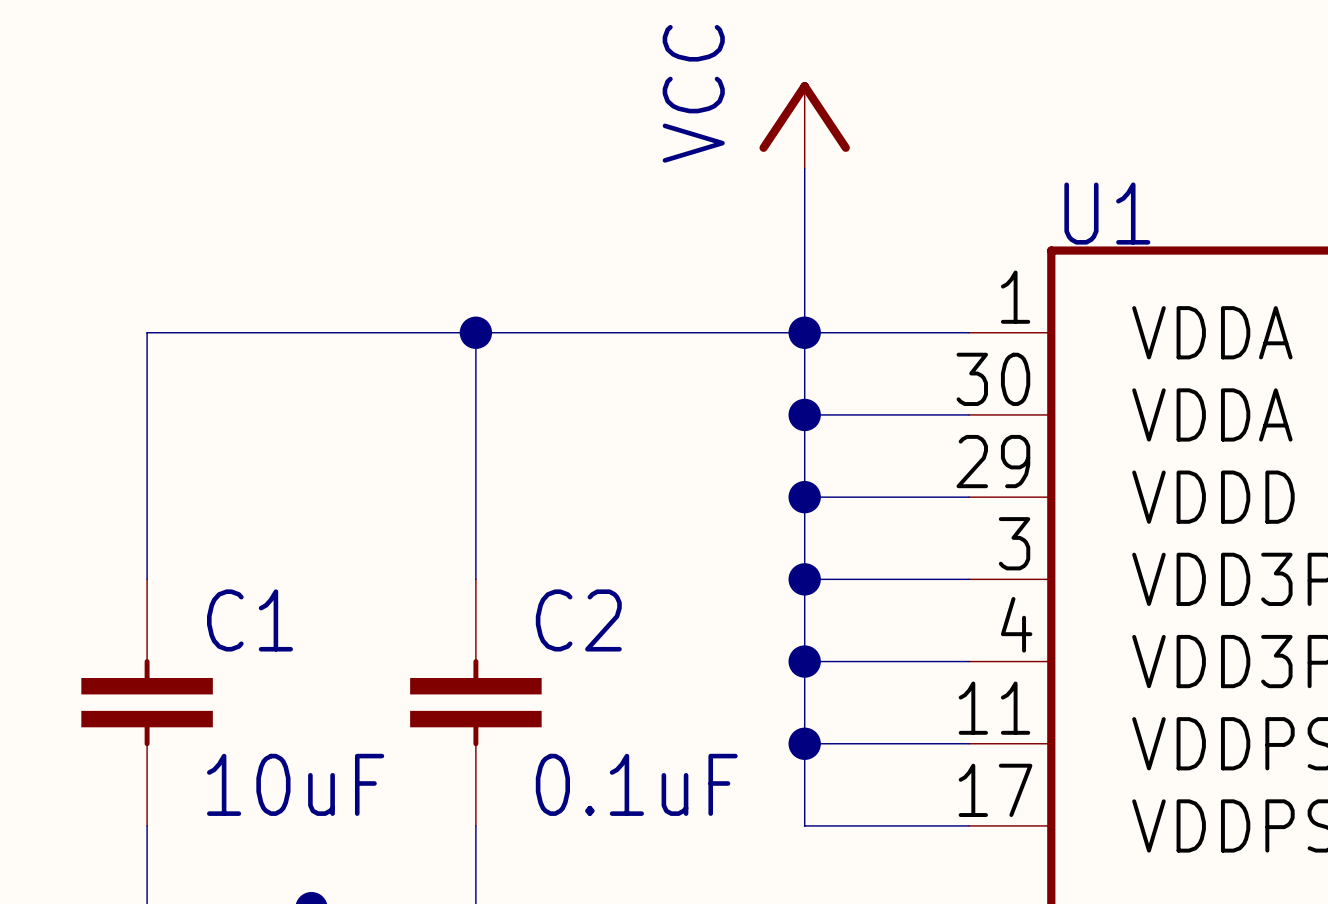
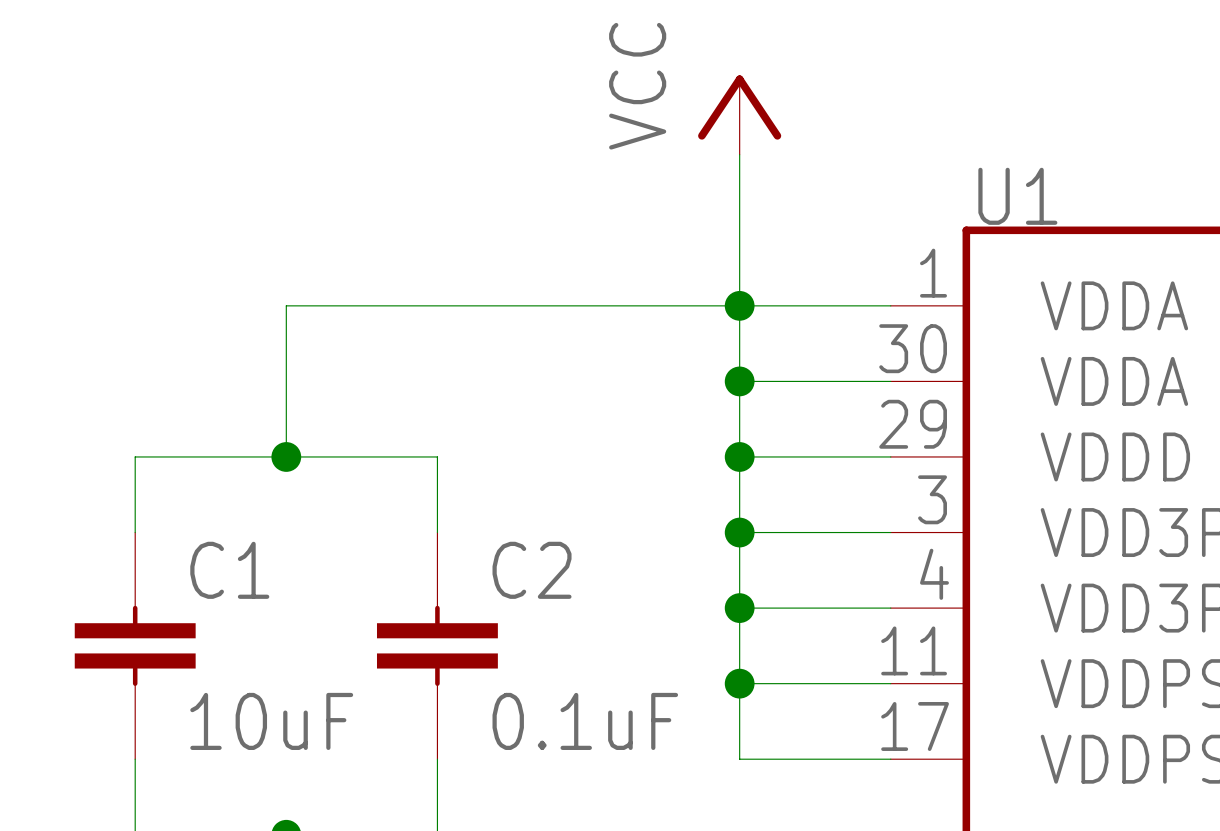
wire: (311, 332) (147, 332) (147, 497) -> (286, 305) (286, 456)
wire: (475, 332) (475, 497) -> (135, 456) (437, 456)
junction: (475, 332) -> none
junction: none -> (286, 456)

